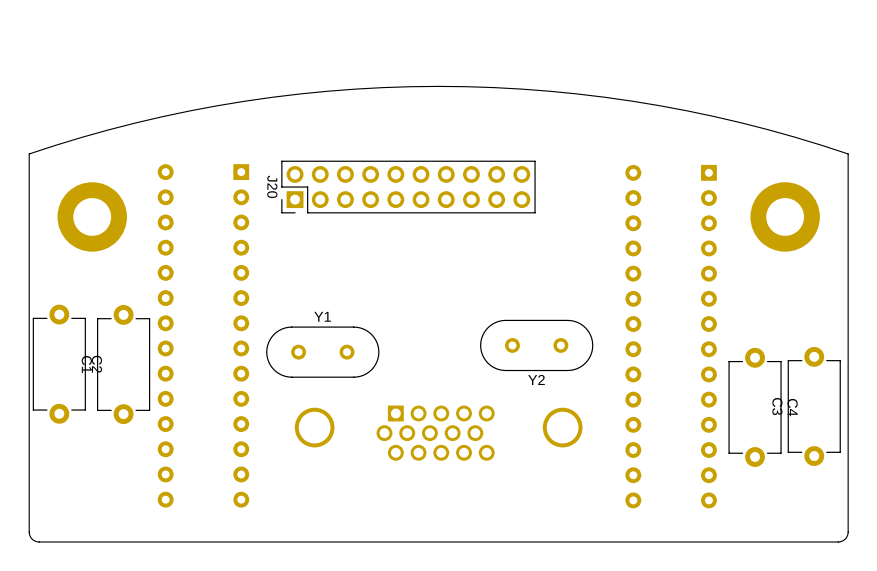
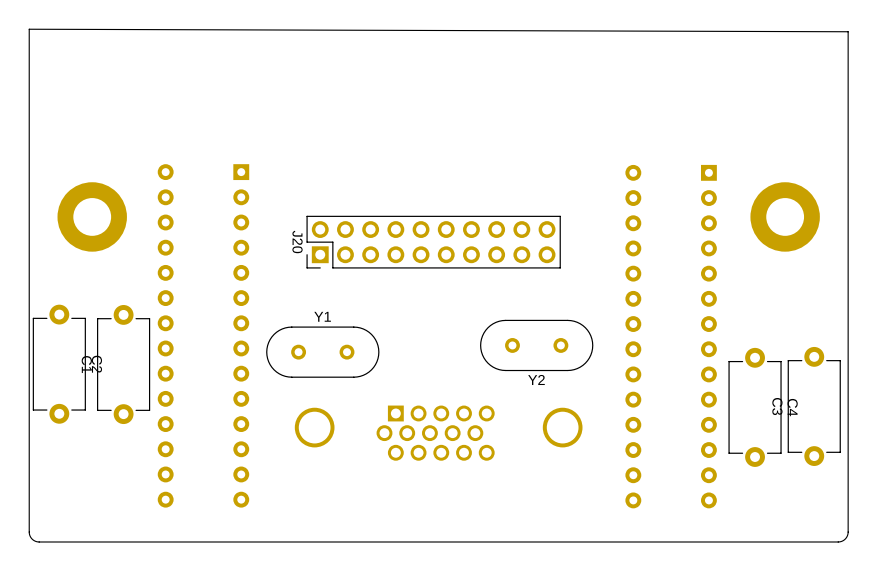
board edge: (848, 153) (741, 122) (659, 105) (549, 91) (438, 86) (355, 89) (244, 101) (135, 122) (29, 153) -> (848, 153) (848, 31) (29, 29) (29, 153)
J20 position: (408, 187) -> (433, 242)

